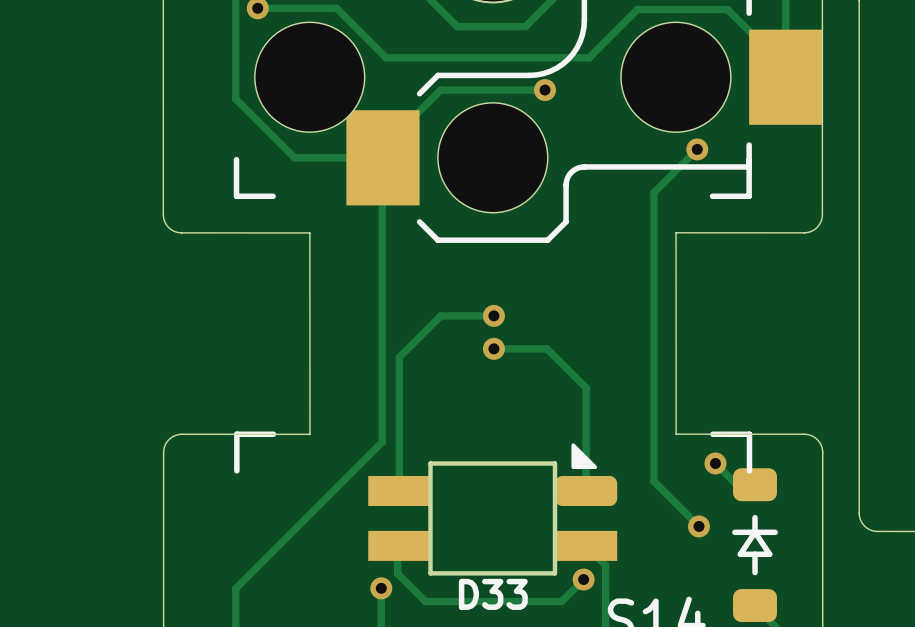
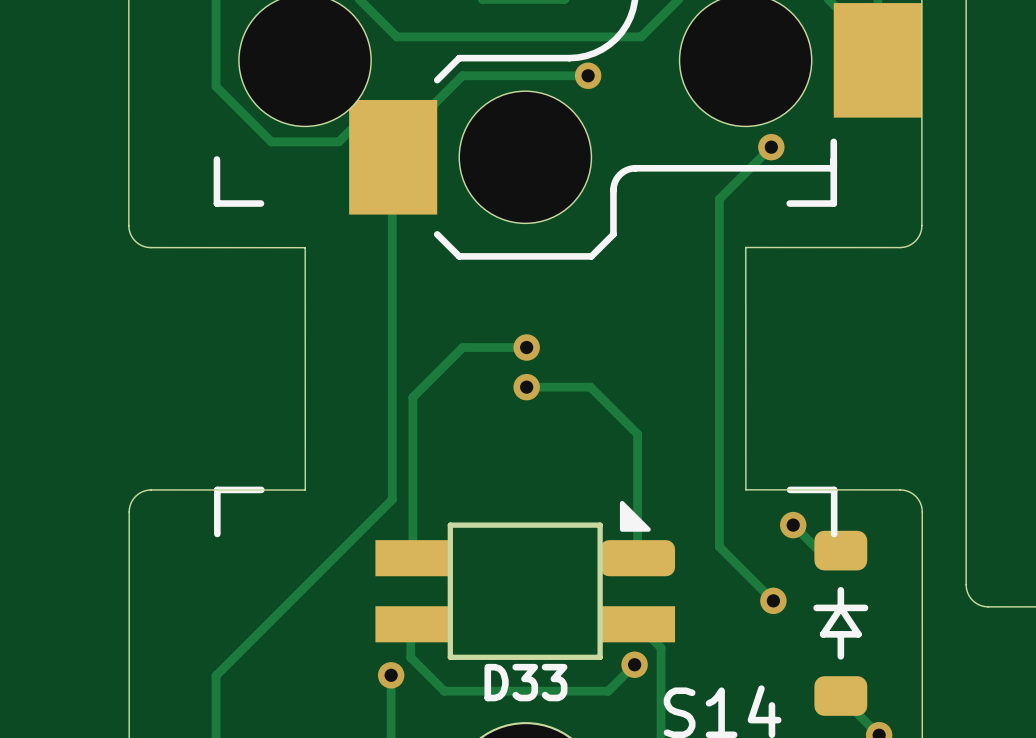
track: (281, 144) (294, 157) (382, 157) -> (271, 141) (338, 141) (358, 122)

